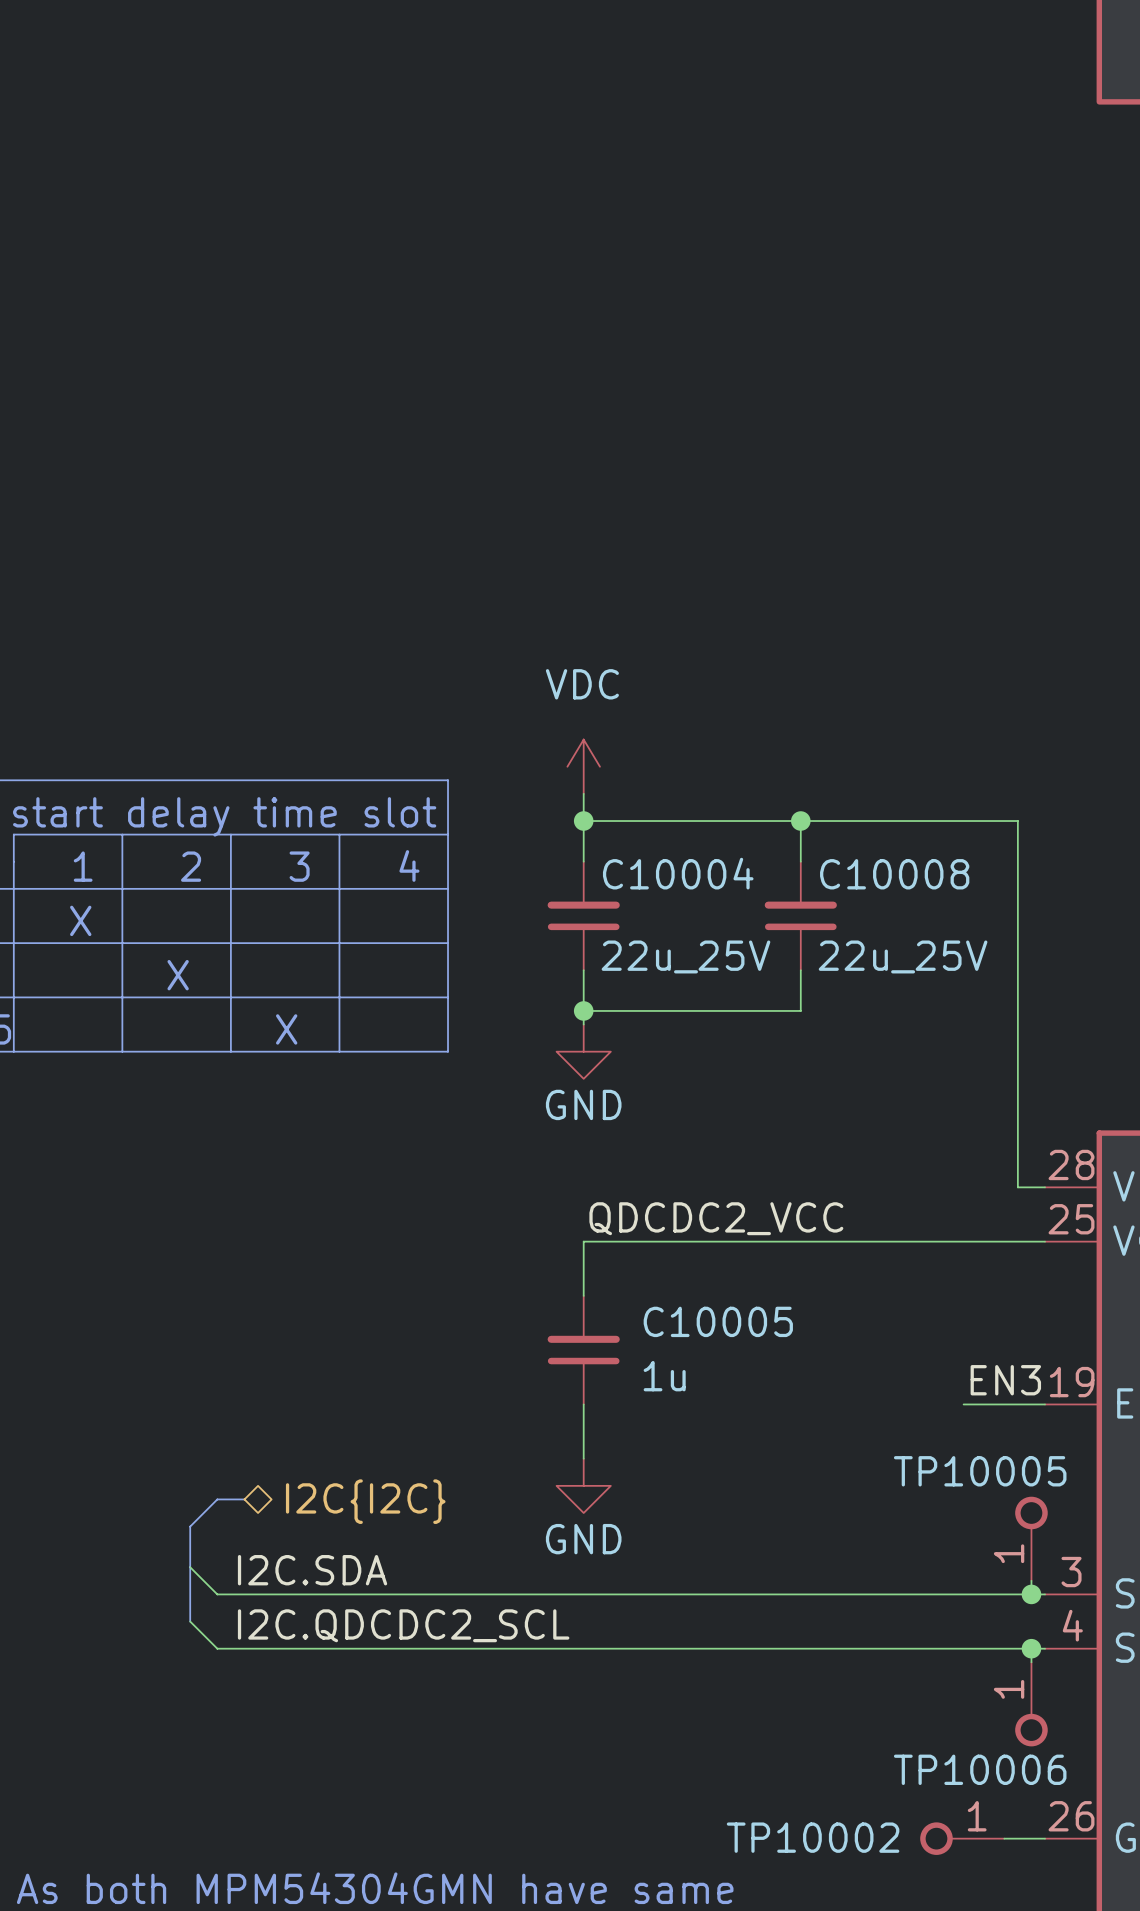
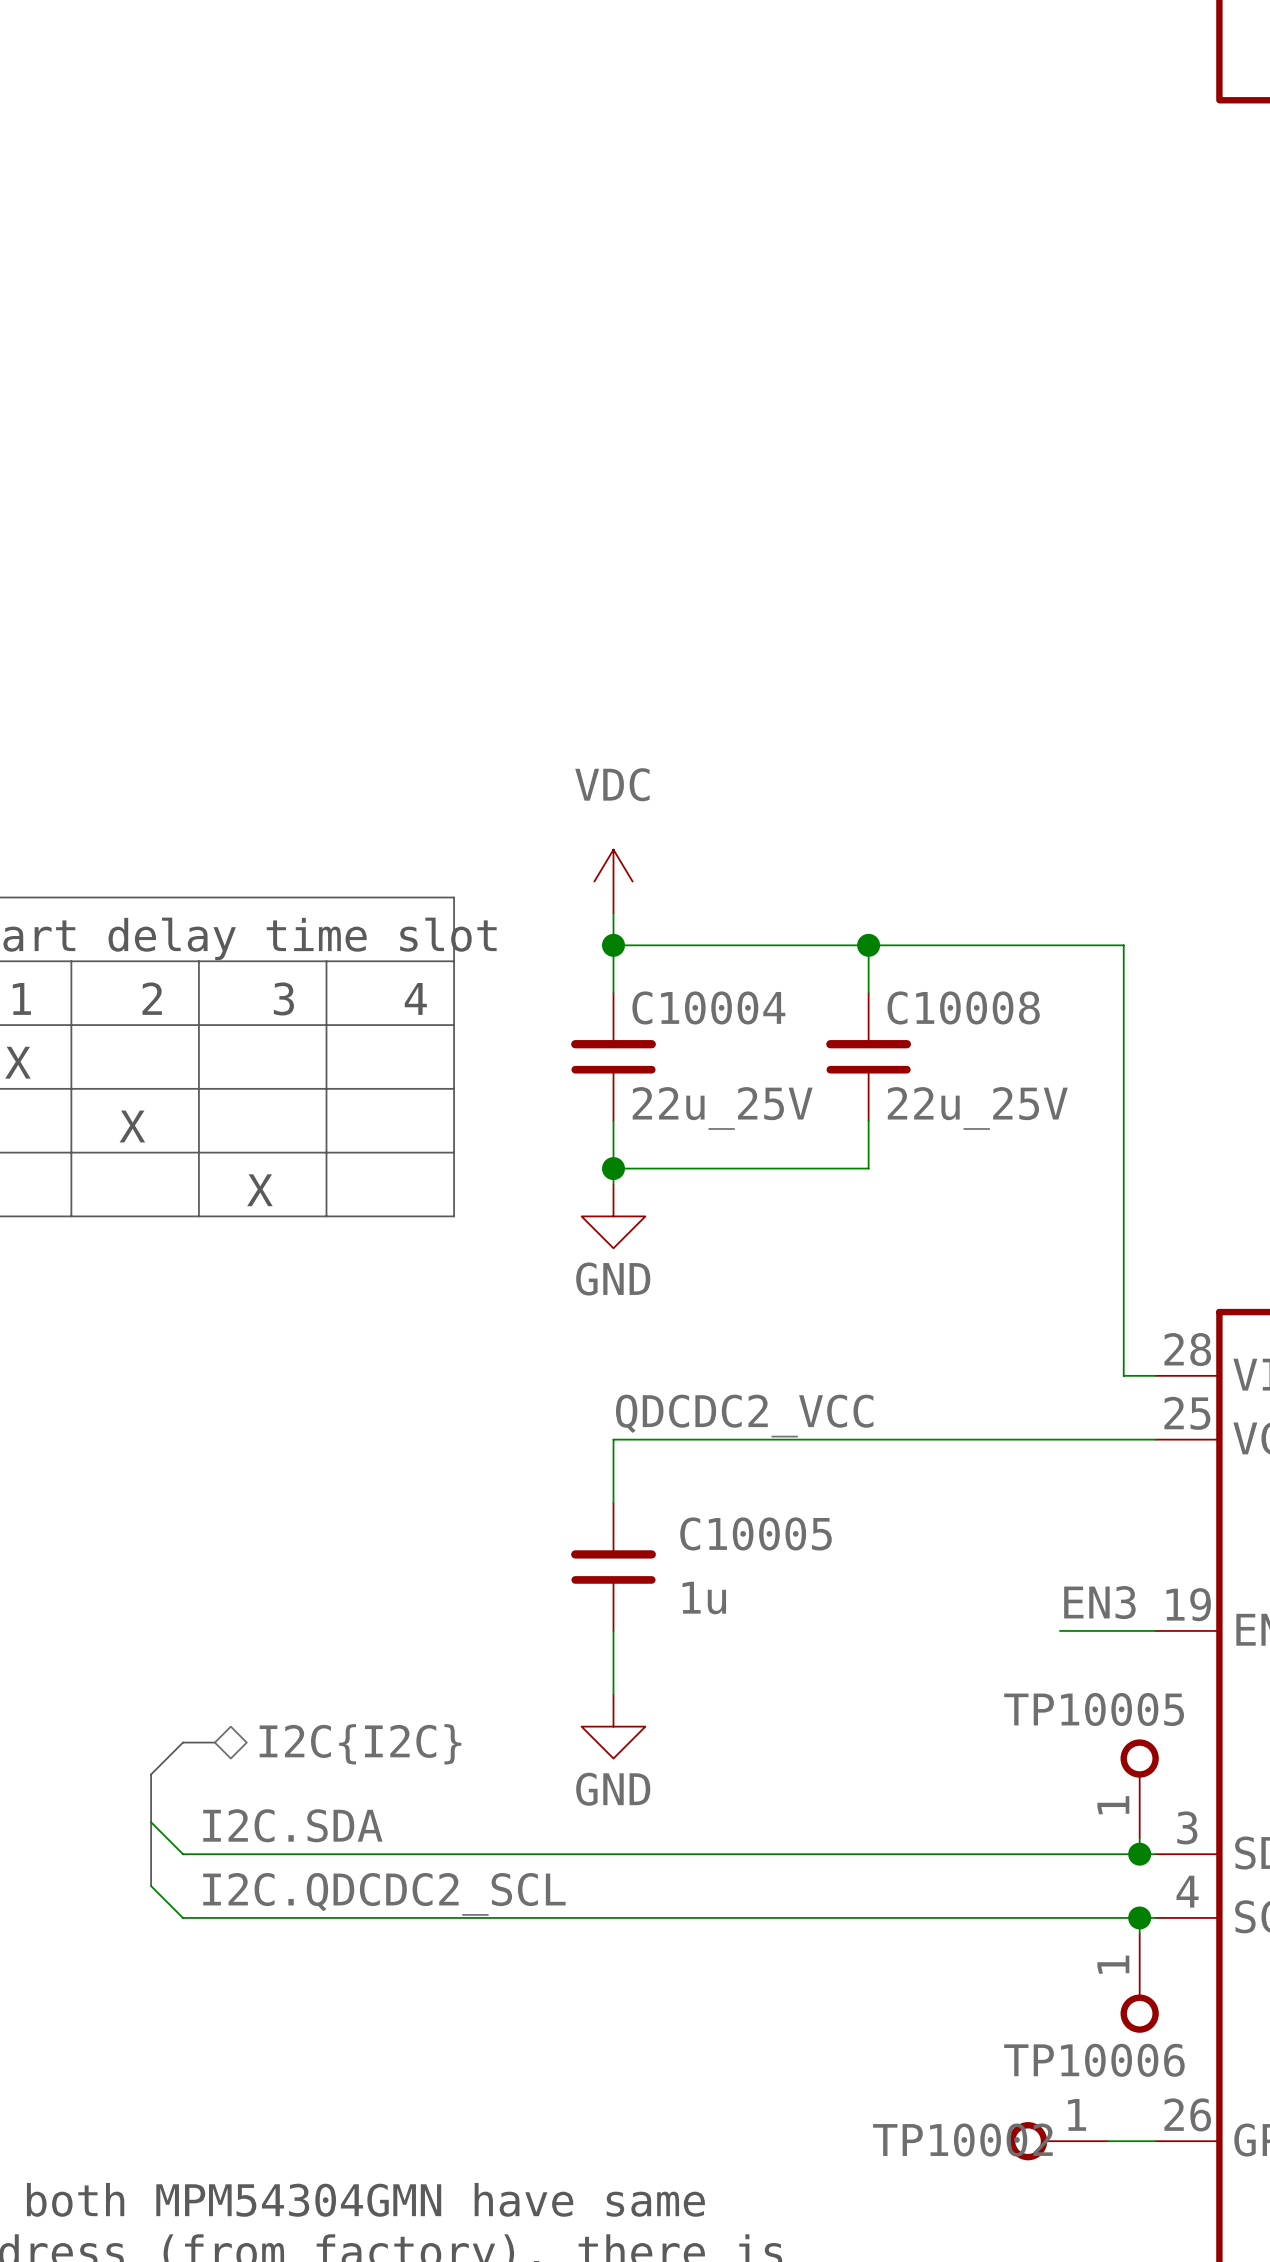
TP10002 name position: TP10002 (813, 1837) -> TP10002 (962, 2140)

